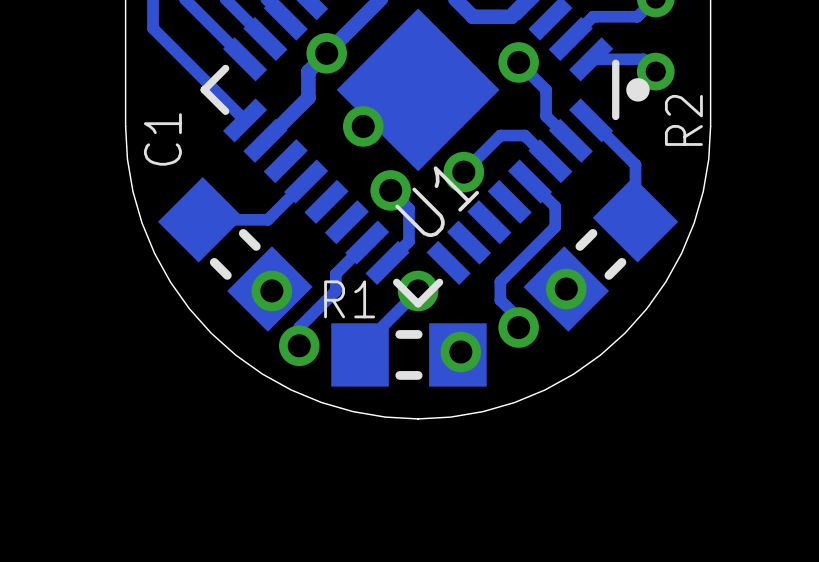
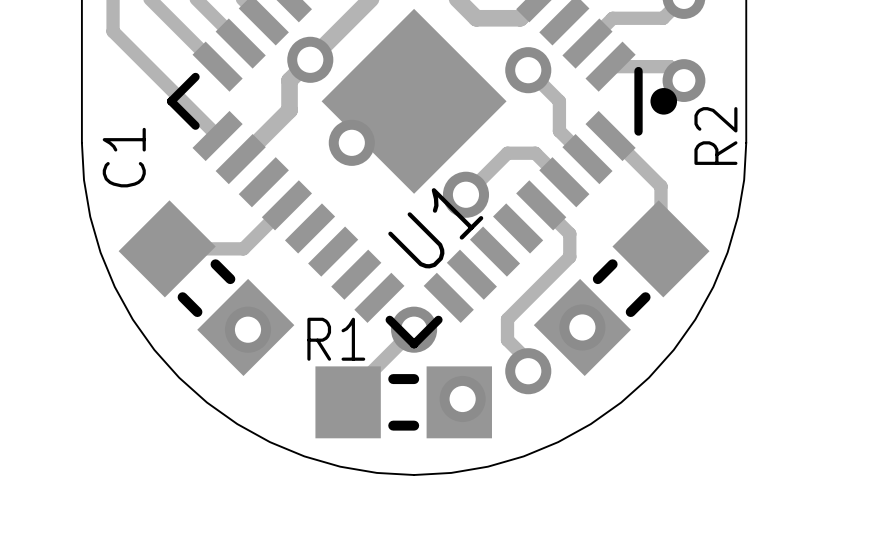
track: (390, 190) (408, 208) (408, 241) (387, 262) -> none
via: (390, 190) -> none
track: (367, 242) (335, 273) (335, 290) (299, 327) (299, 345) -> none
via: (299, 345) -> none

